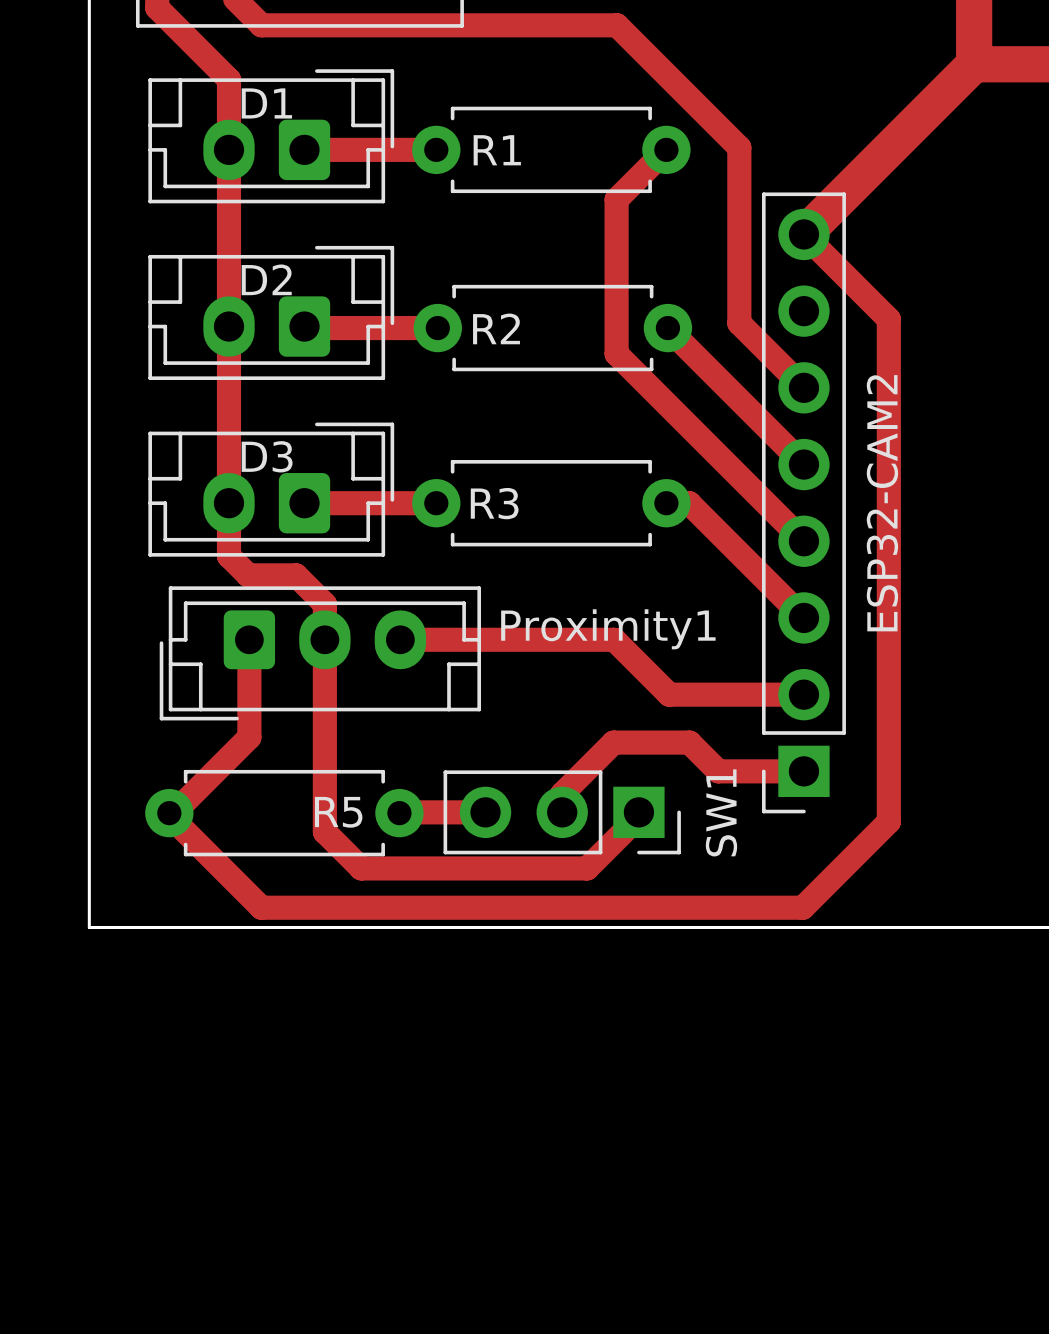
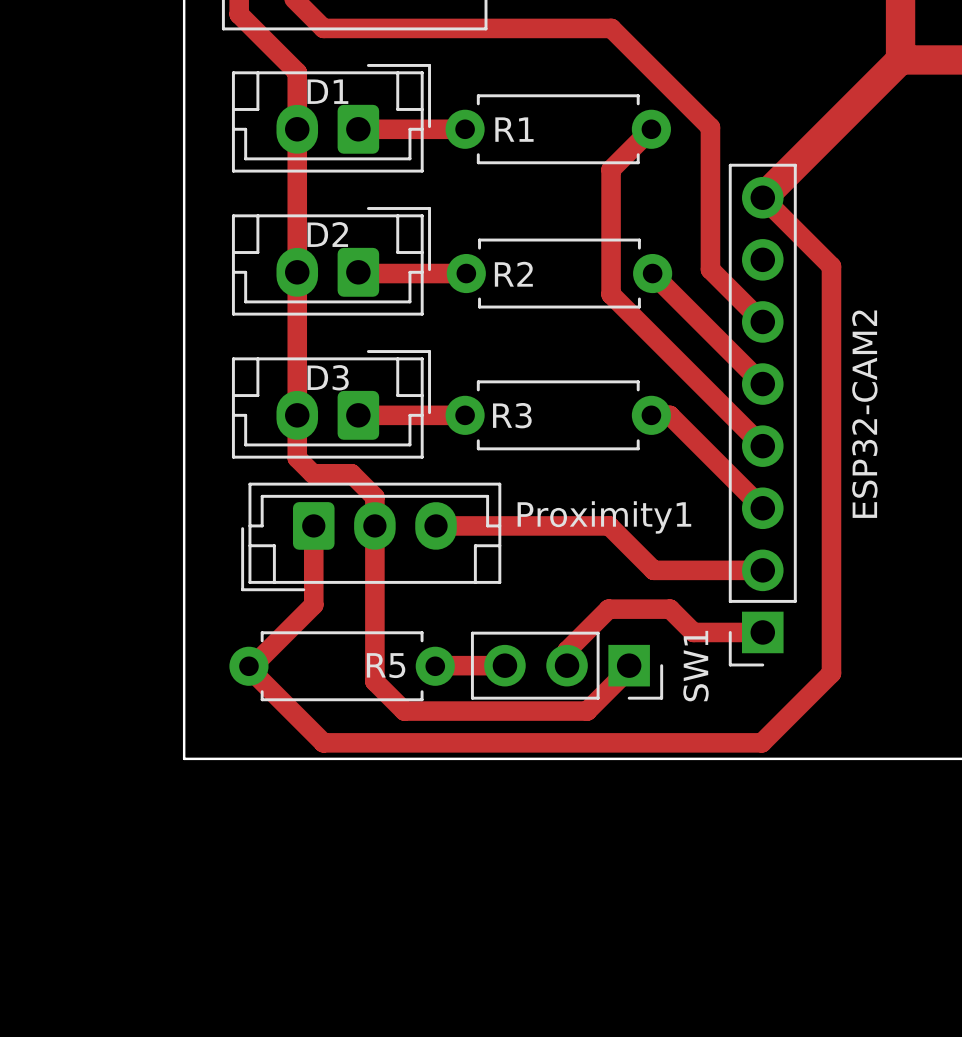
ESP32-CAM2 name position: ESP32-CAM2 (882, 503) -> ESP32-CAM2 (864, 414)

